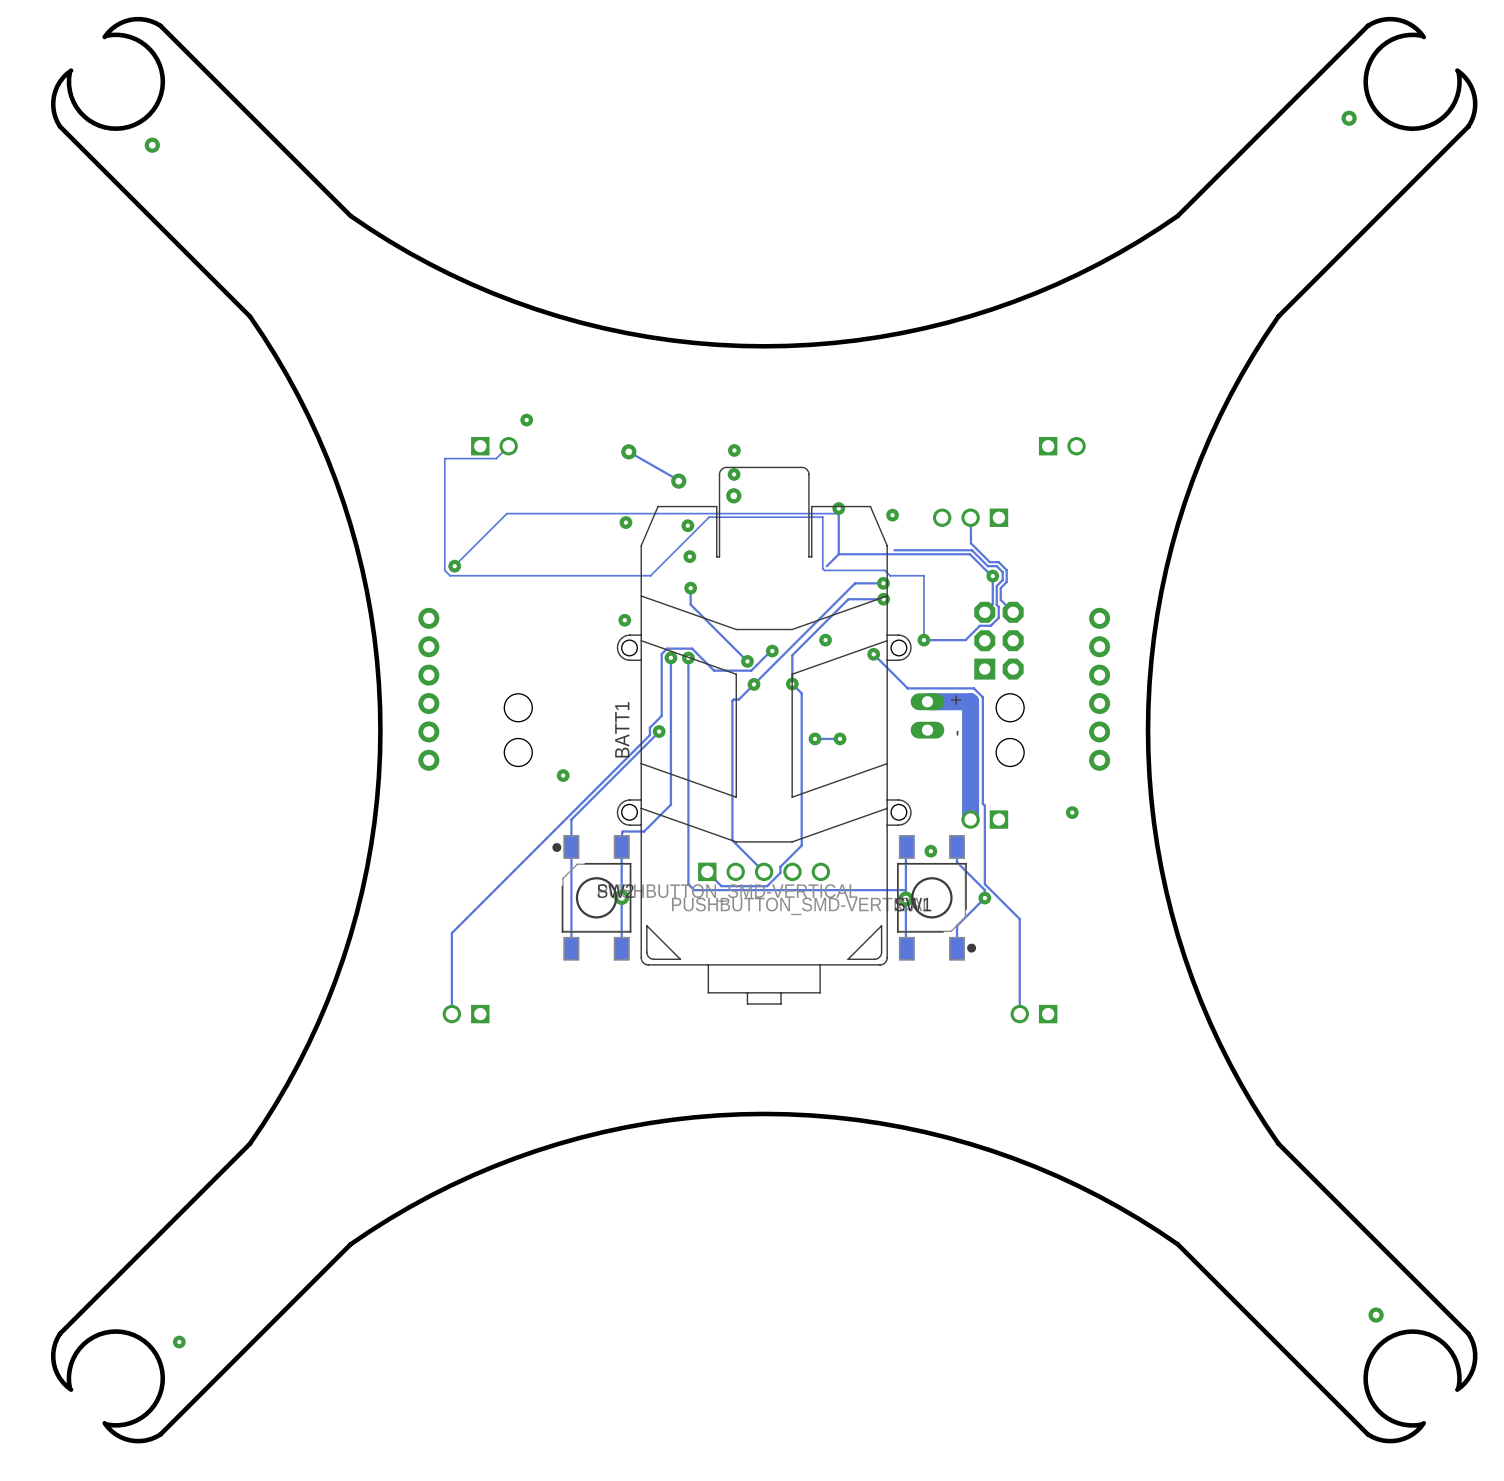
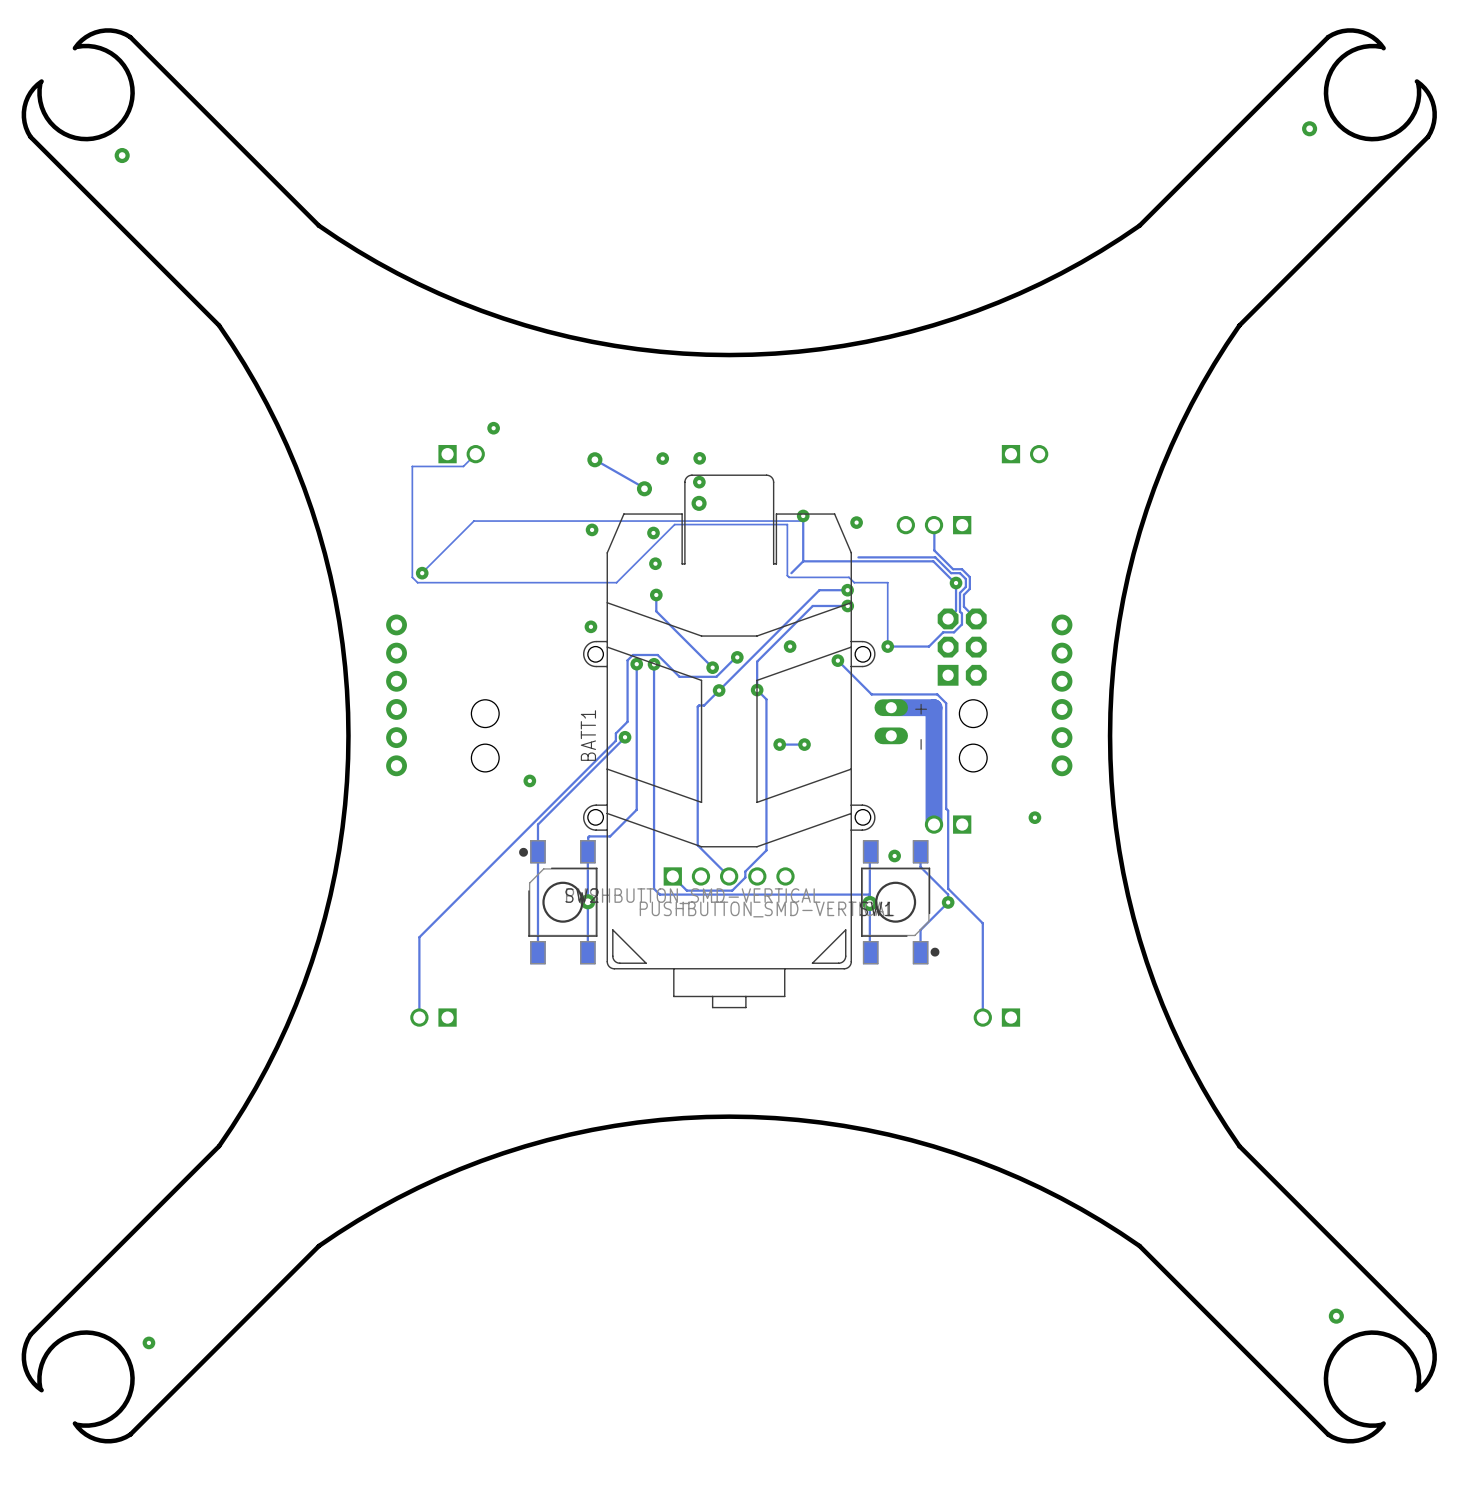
via: none -> (662, 458)

